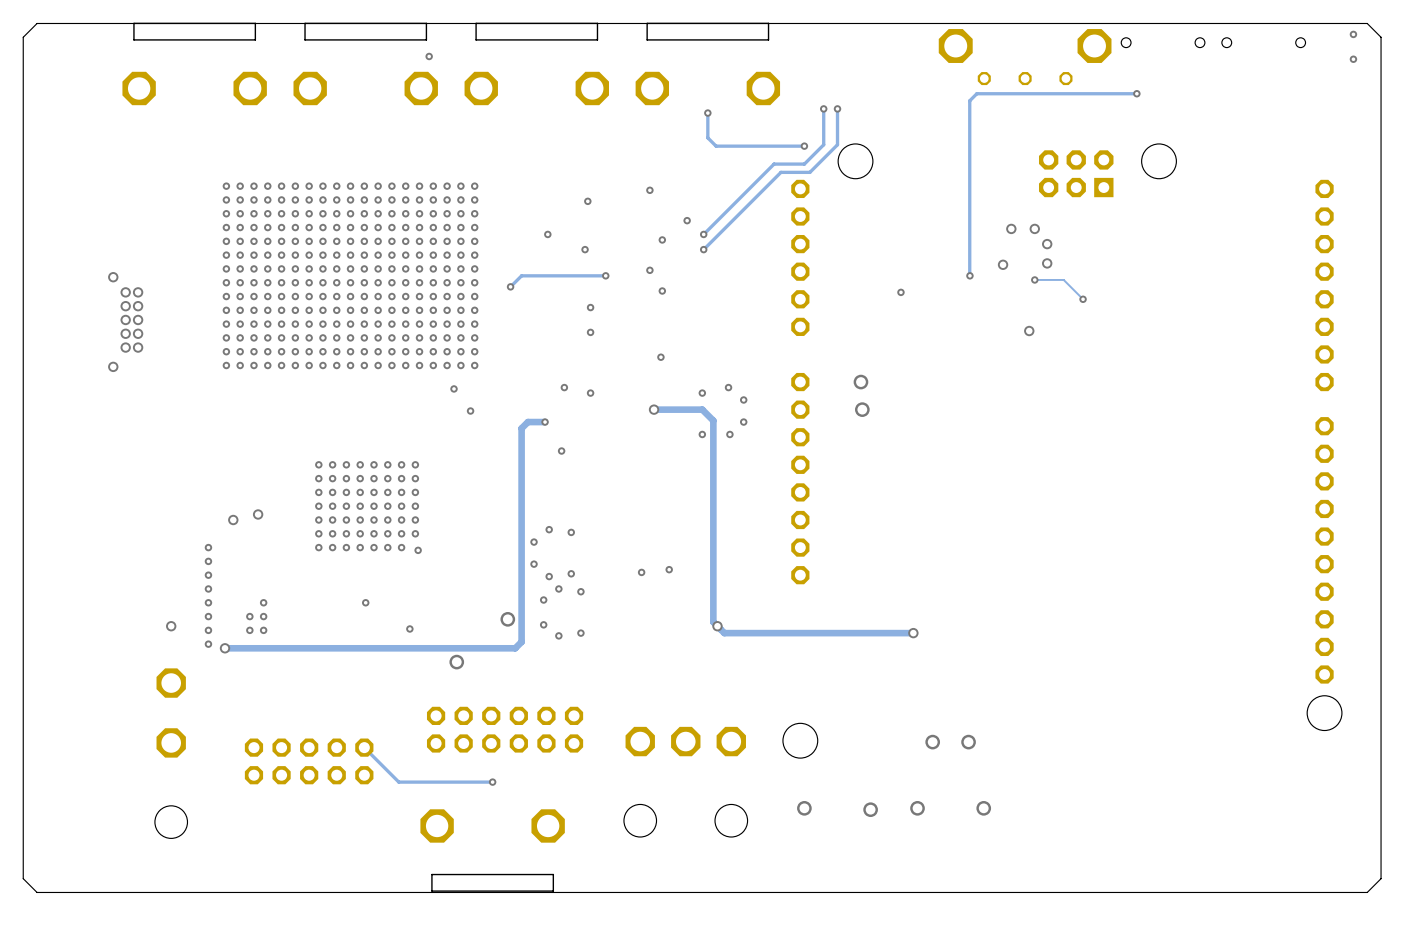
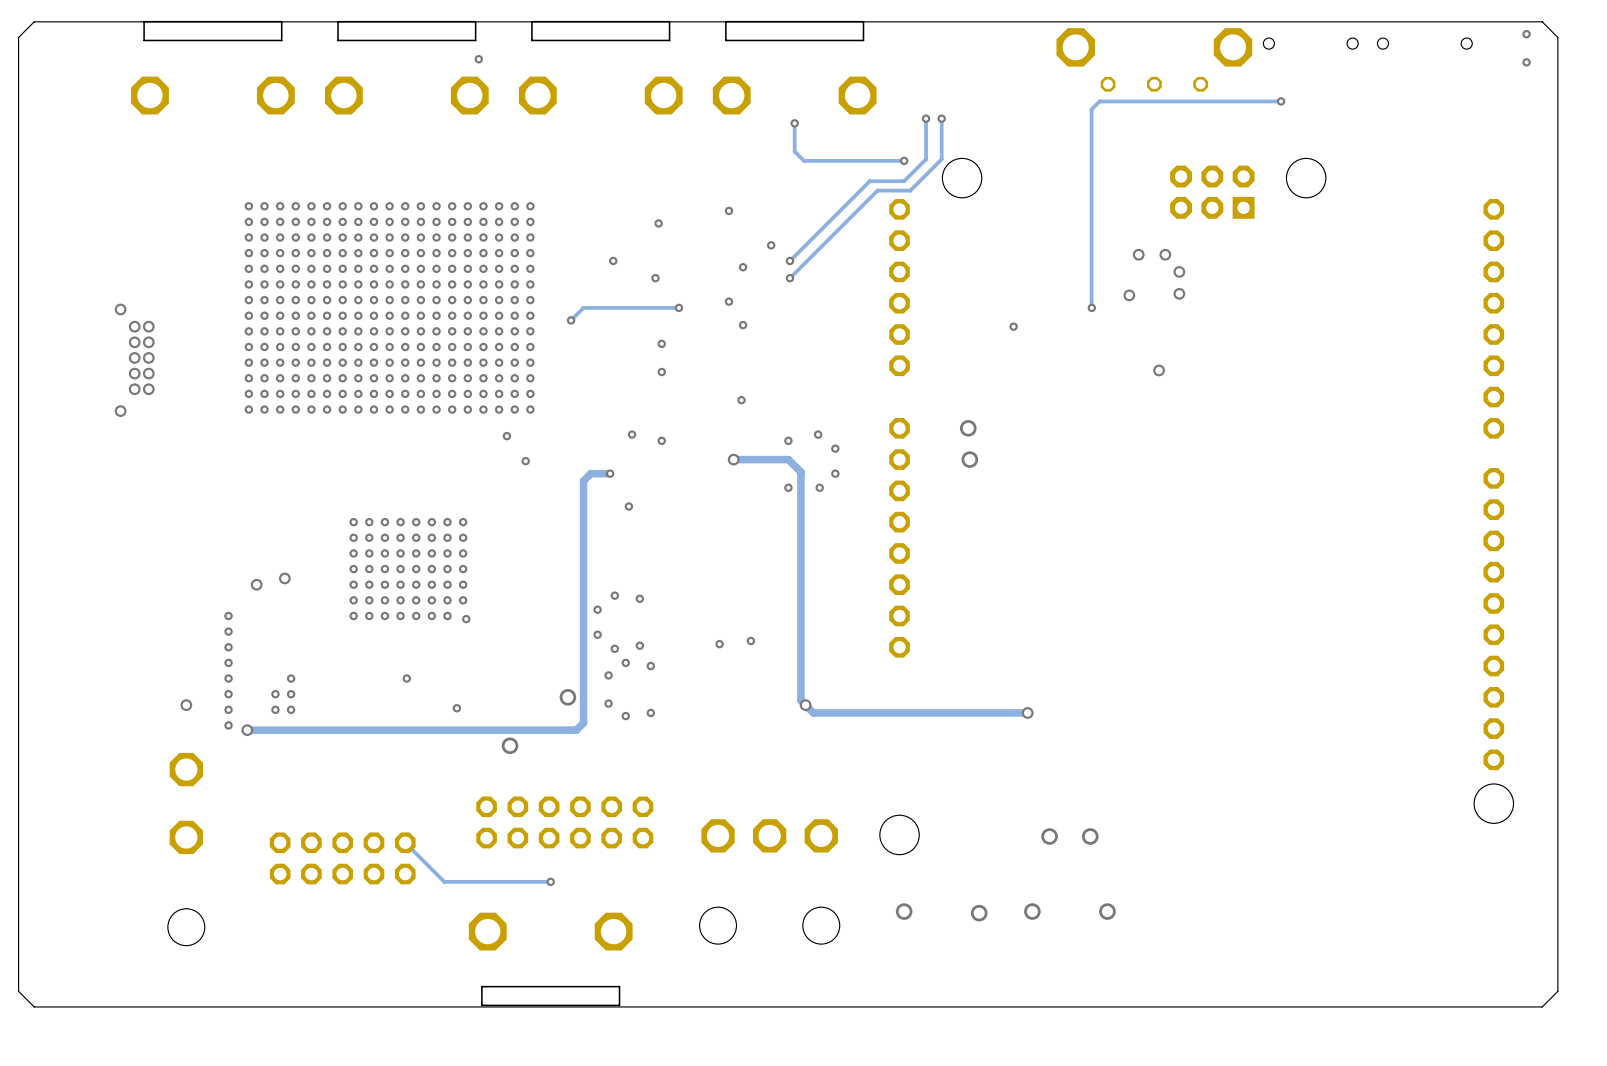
track: (1034, 279) (1063, 279) (1083, 299) -> none
via: (1034, 279) -> none
via: (1083, 299) -> none

